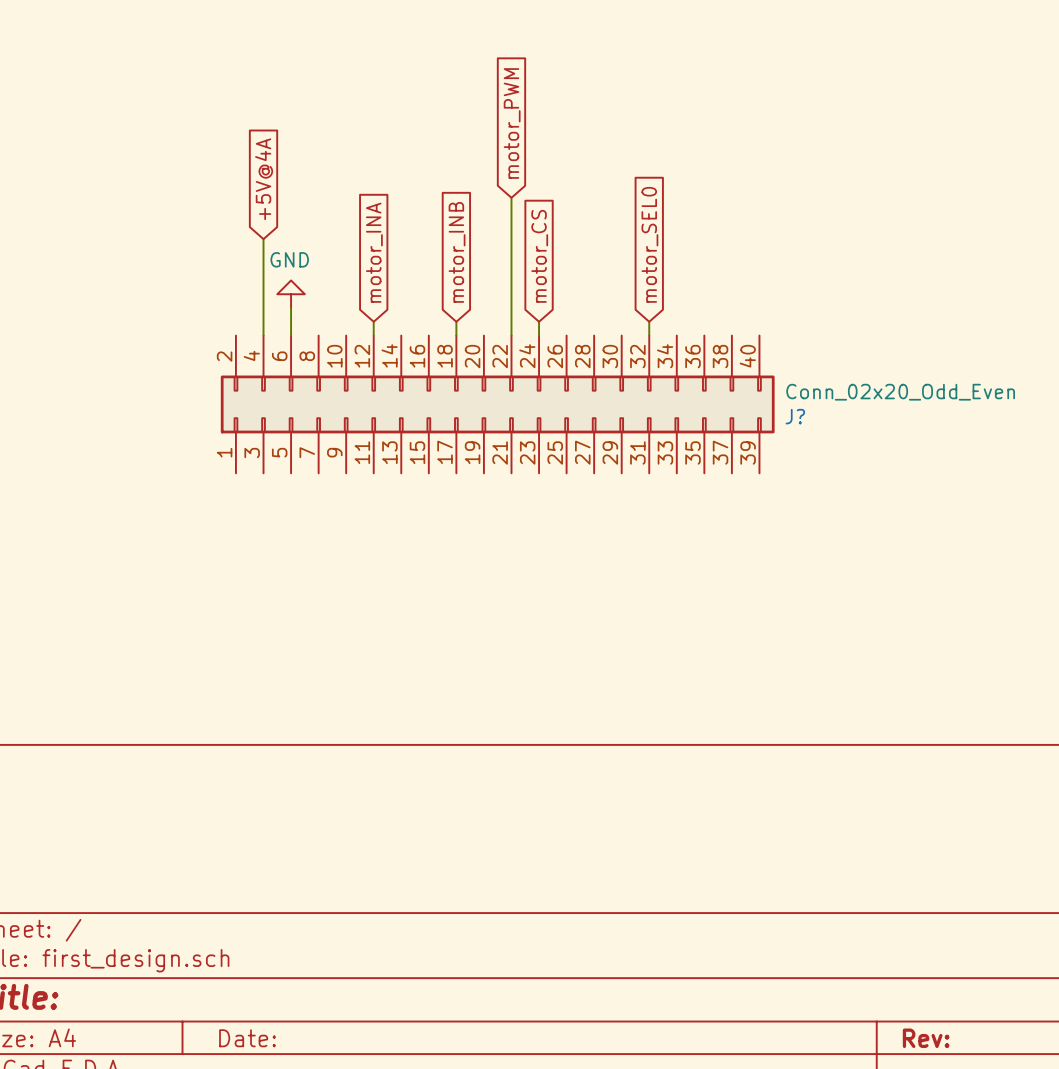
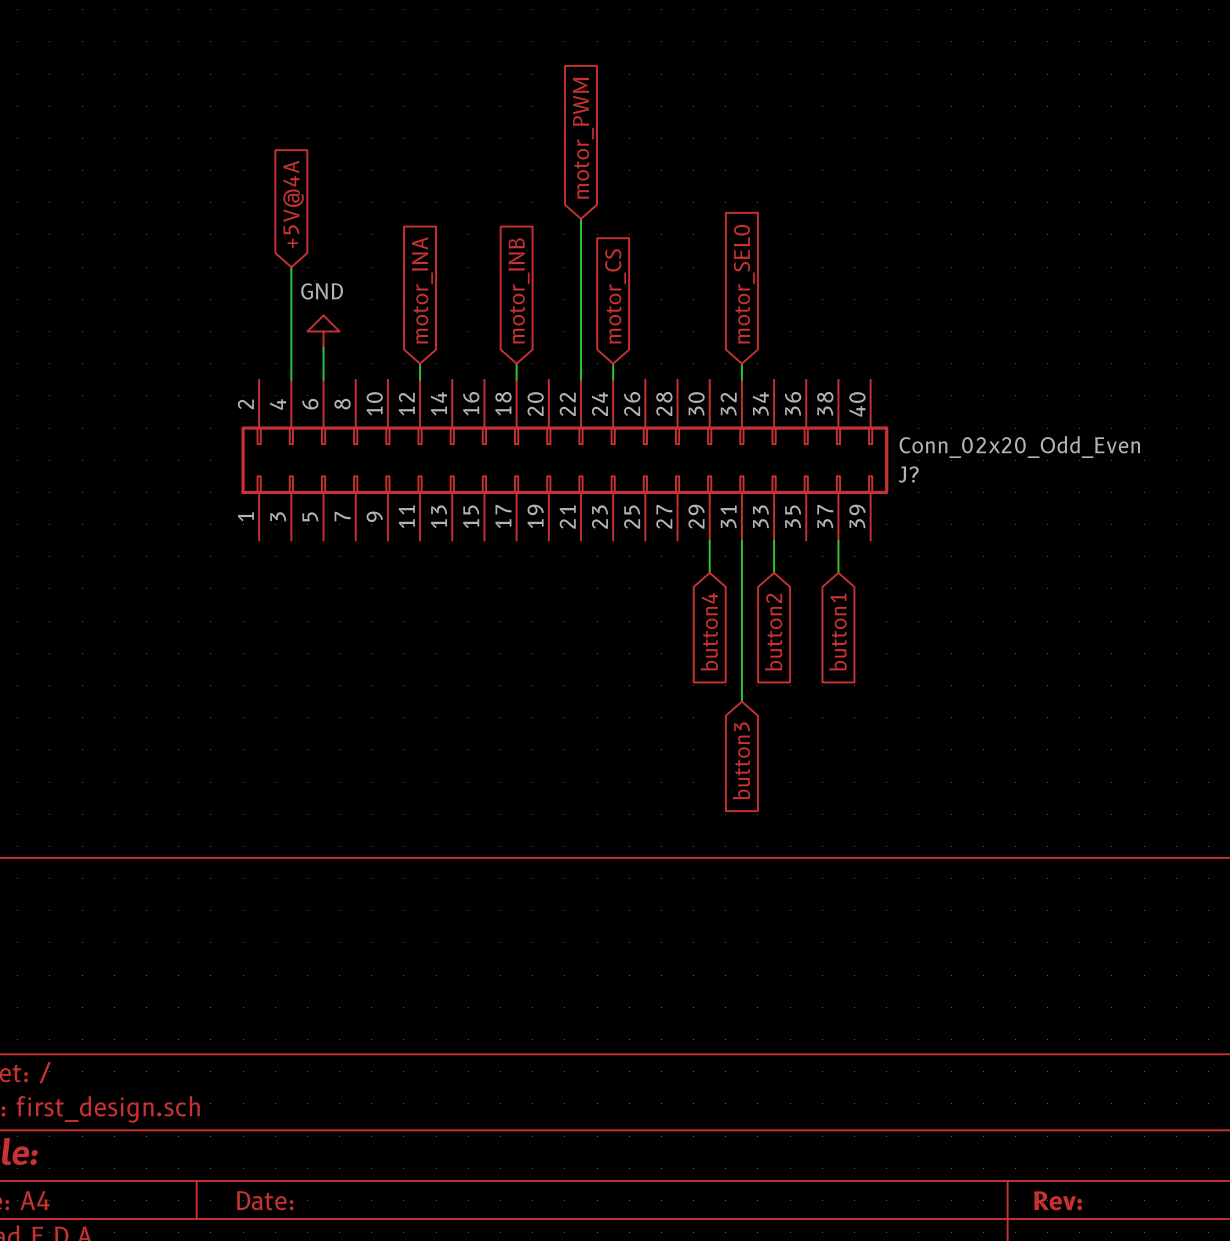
wire: none -> (709, 540) (709, 572)
wire: none -> (741, 540) (741, 701)
wire: none -> (774, 540) (774, 572)
wire: none -> (838, 540) (838, 572)
global label: none -> button4 (709, 631)
global label: none -> button2 (773, 632)
global label: none -> button1 (838, 632)
global label: none -> button3 (741, 760)

